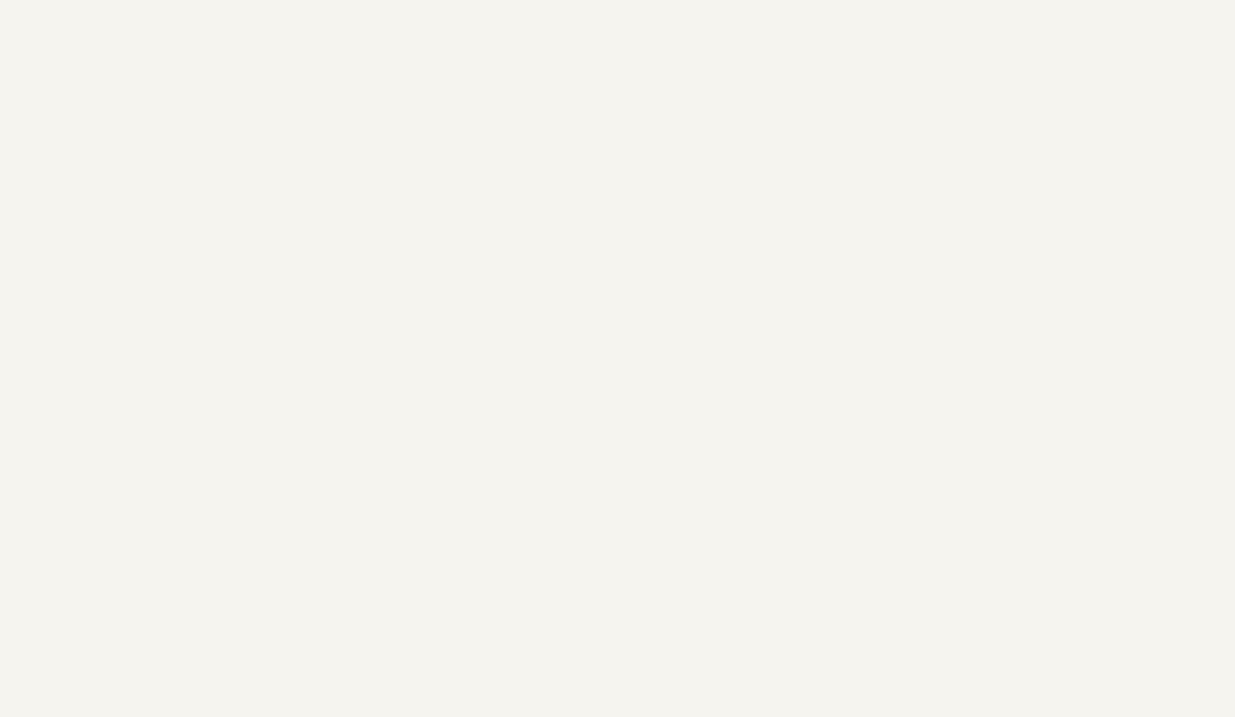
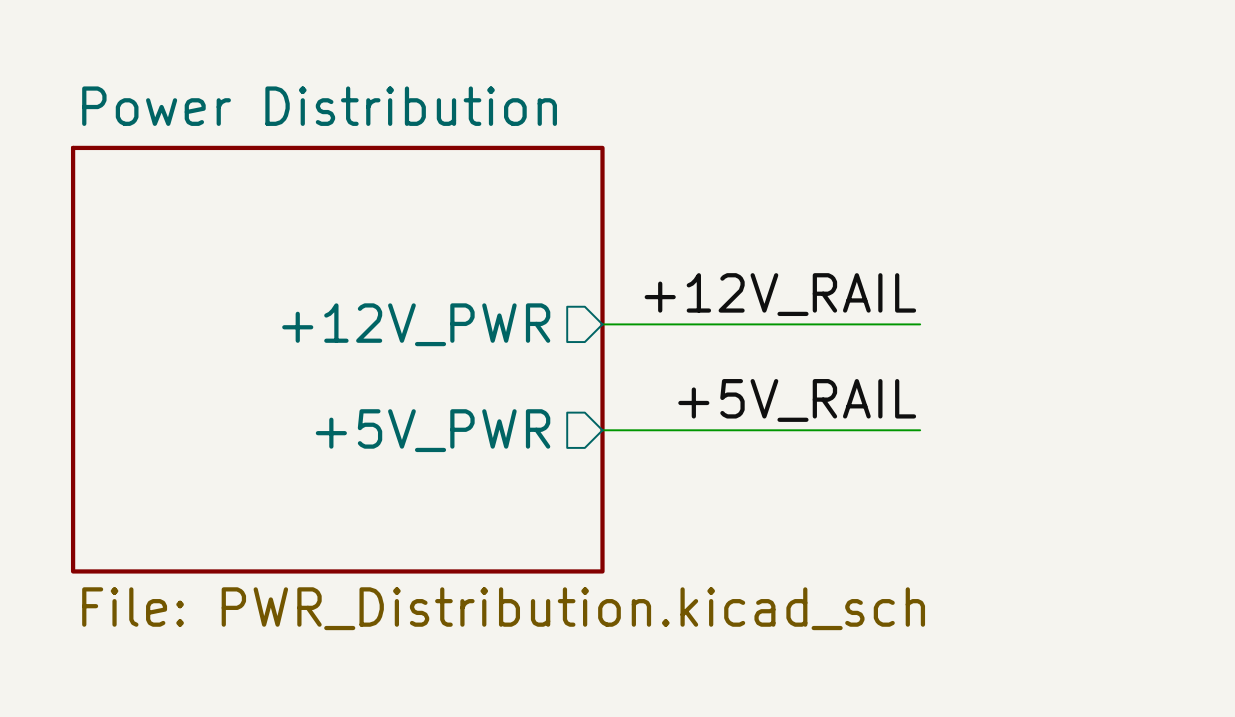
label: none -> +12V_RAIL (780, 294)
wire: none -> (602, 324) (920, 324)
sheet pin: none -> +12V_PWR (416, 324)
sheet Power Distribution: none -> File: PWR_Distribution.kicad_sch (337, 359)
label: none -> +5V_RAIL (797, 400)
wire: none -> (602, 430) (920, 430)
sheet pin: none -> +5V_PWR (433, 430)

